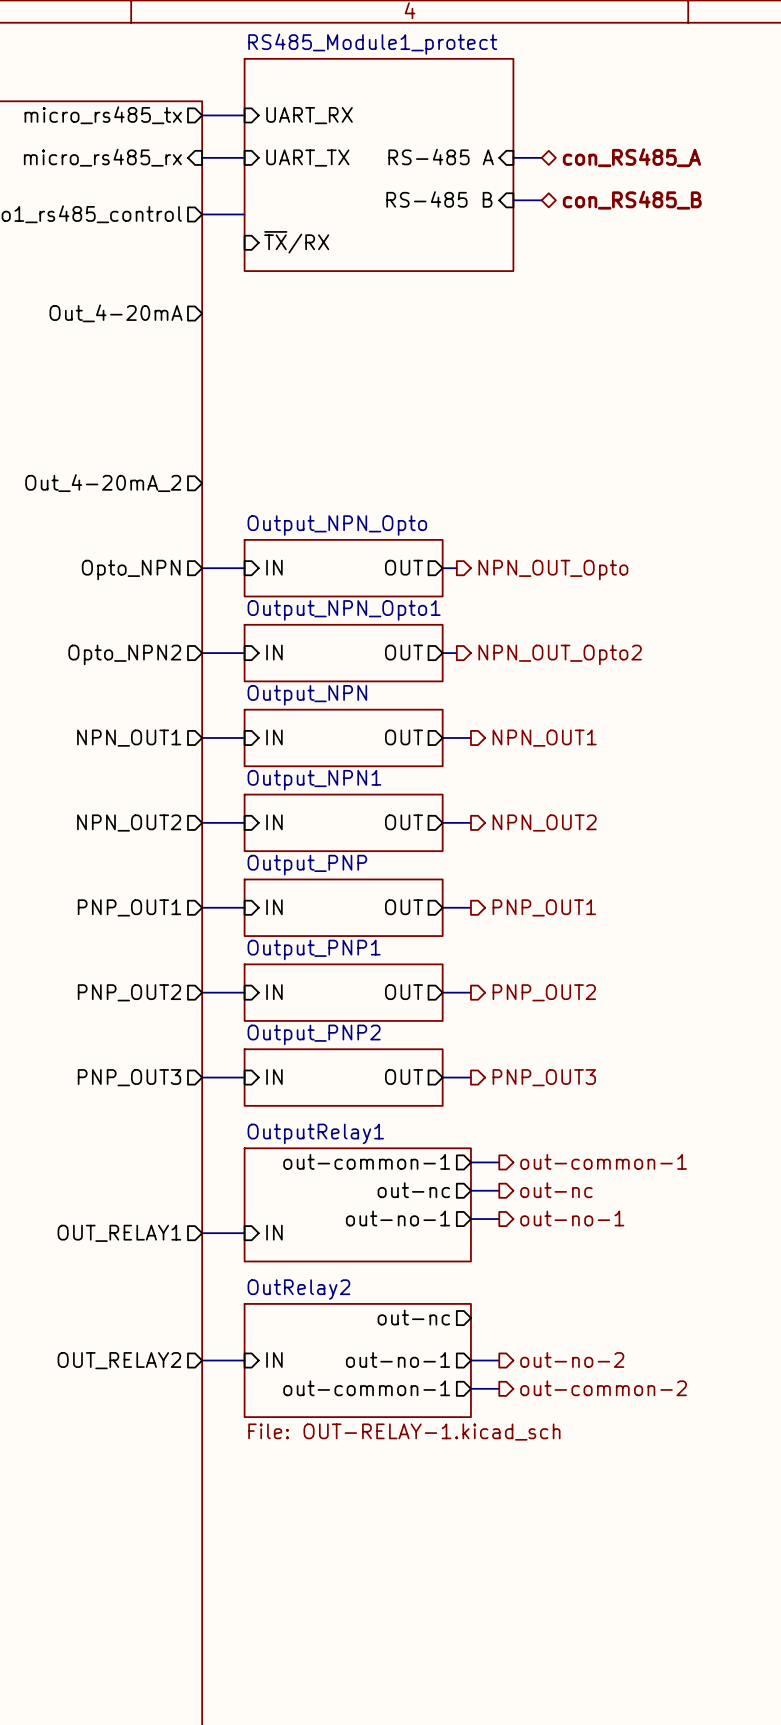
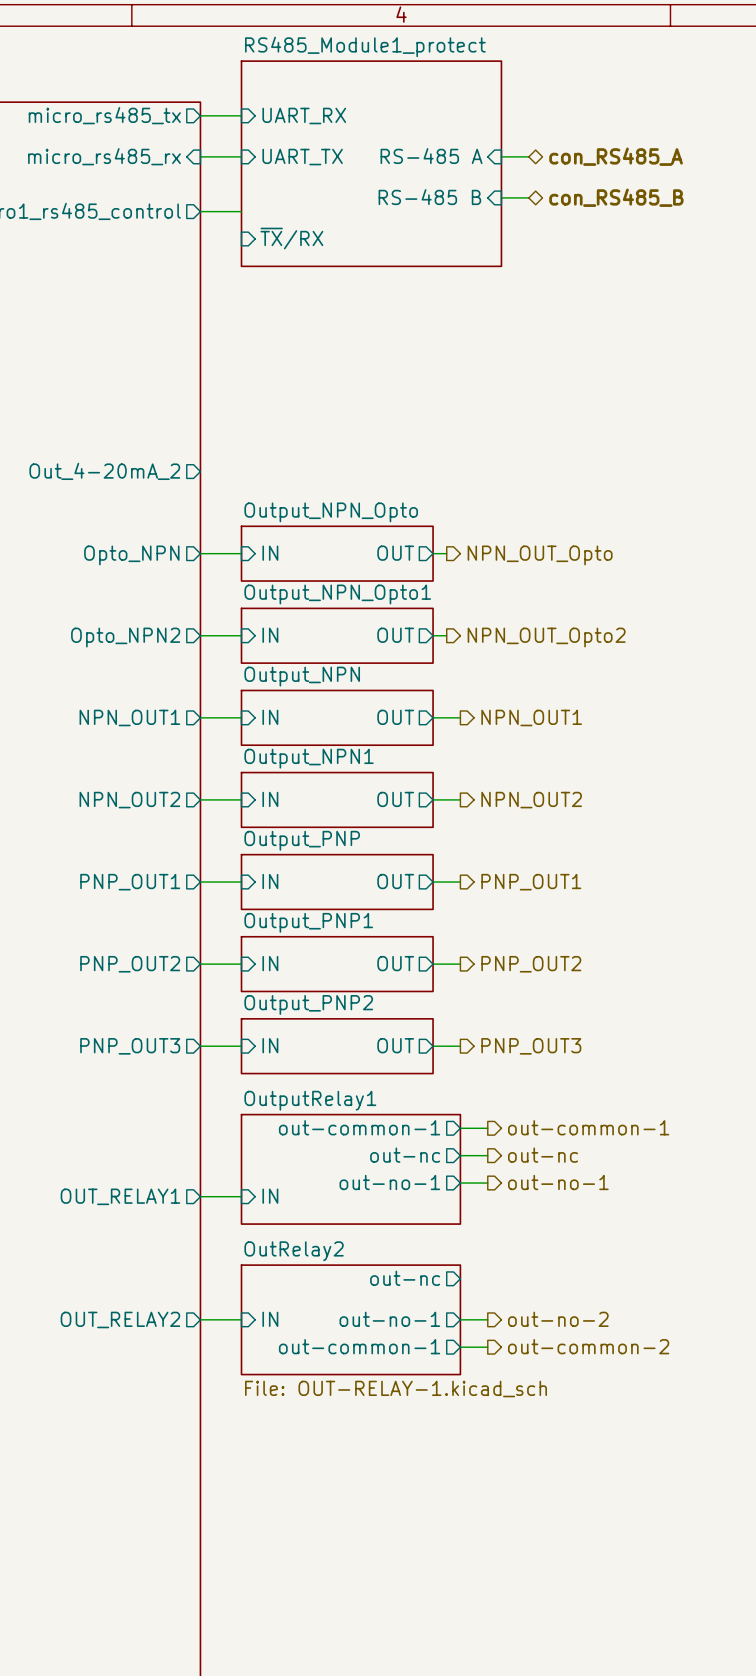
sheet pin: Out_4-20mA (116, 313) -> none

